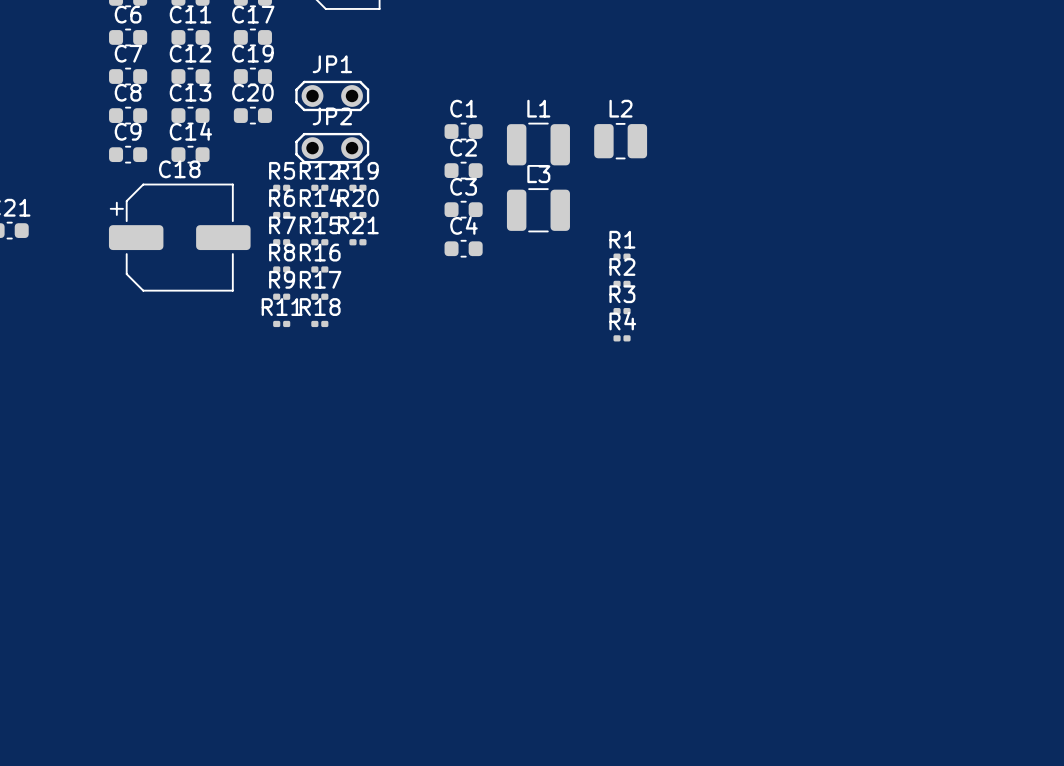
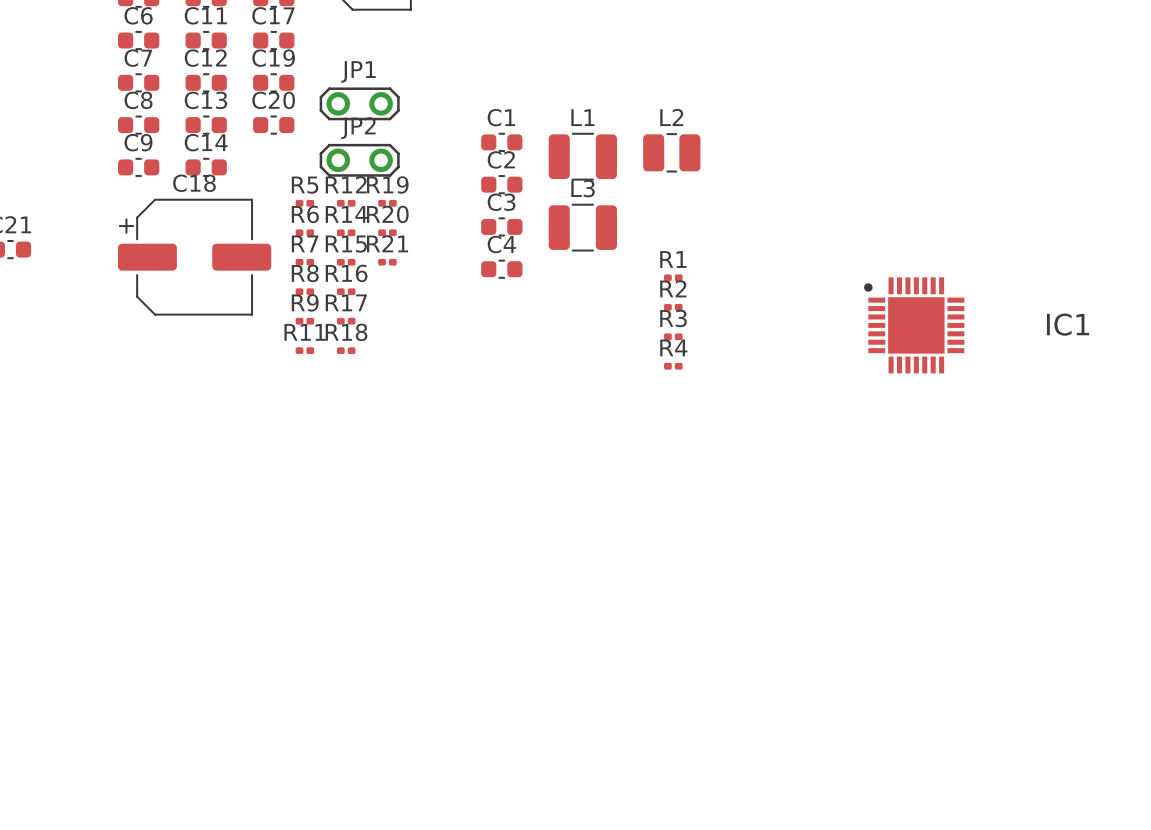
IC1: none -> (914, 325)

